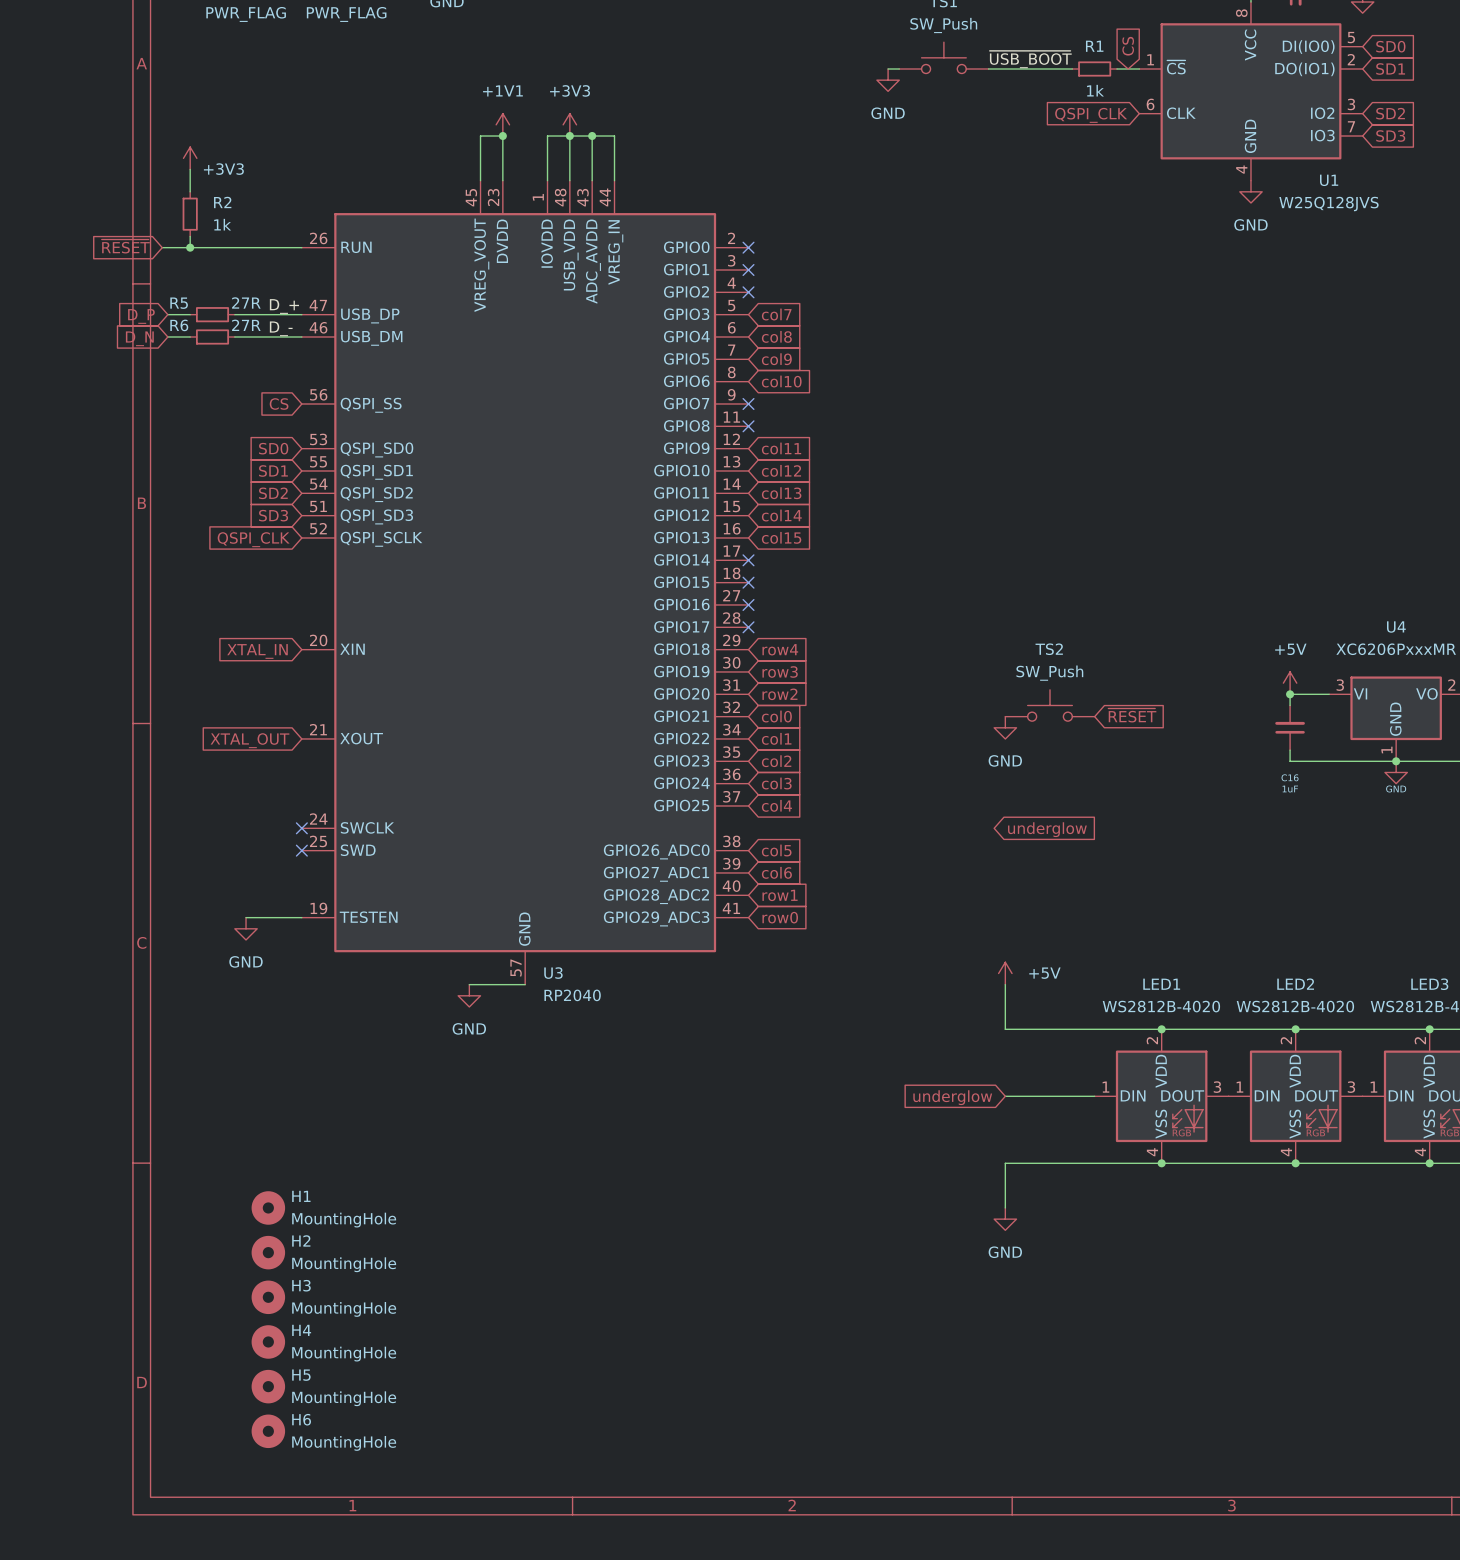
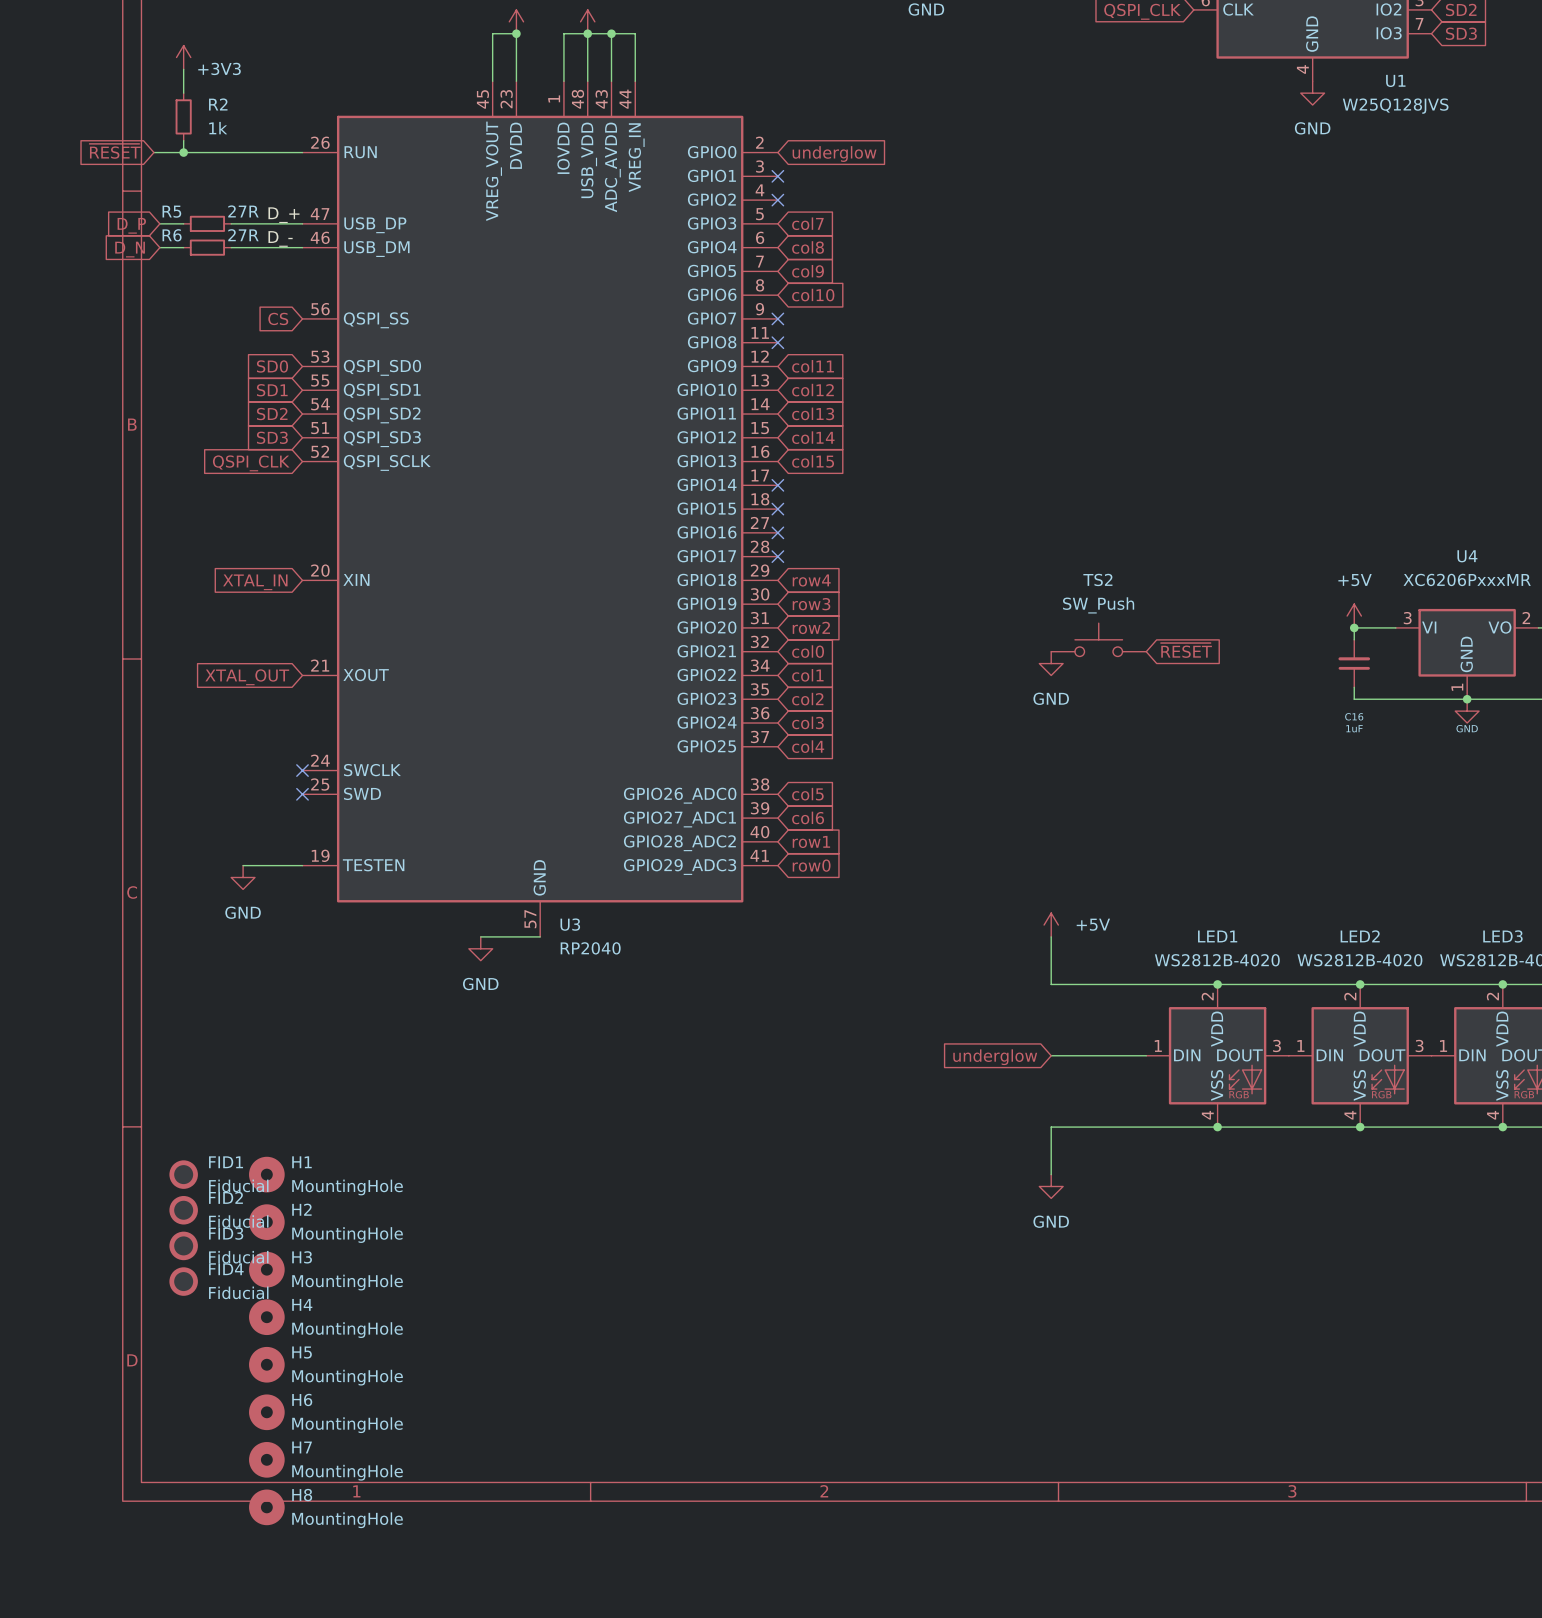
no-connect mark: (748, 247) -> none
global label: none -> underglow (834, 154)
global label: underglow (1047, 829) -> none
FID1: none -> Fiducial (183, 1174)
FID2: none -> Fiducial (183, 1210)
FID3: none -> Fiducial (183, 1245)
FID4: none -> Fiducial (183, 1281)
H7: none -> MountingHole (266, 1459)
H8: none -> MountingHole (266, 1507)

